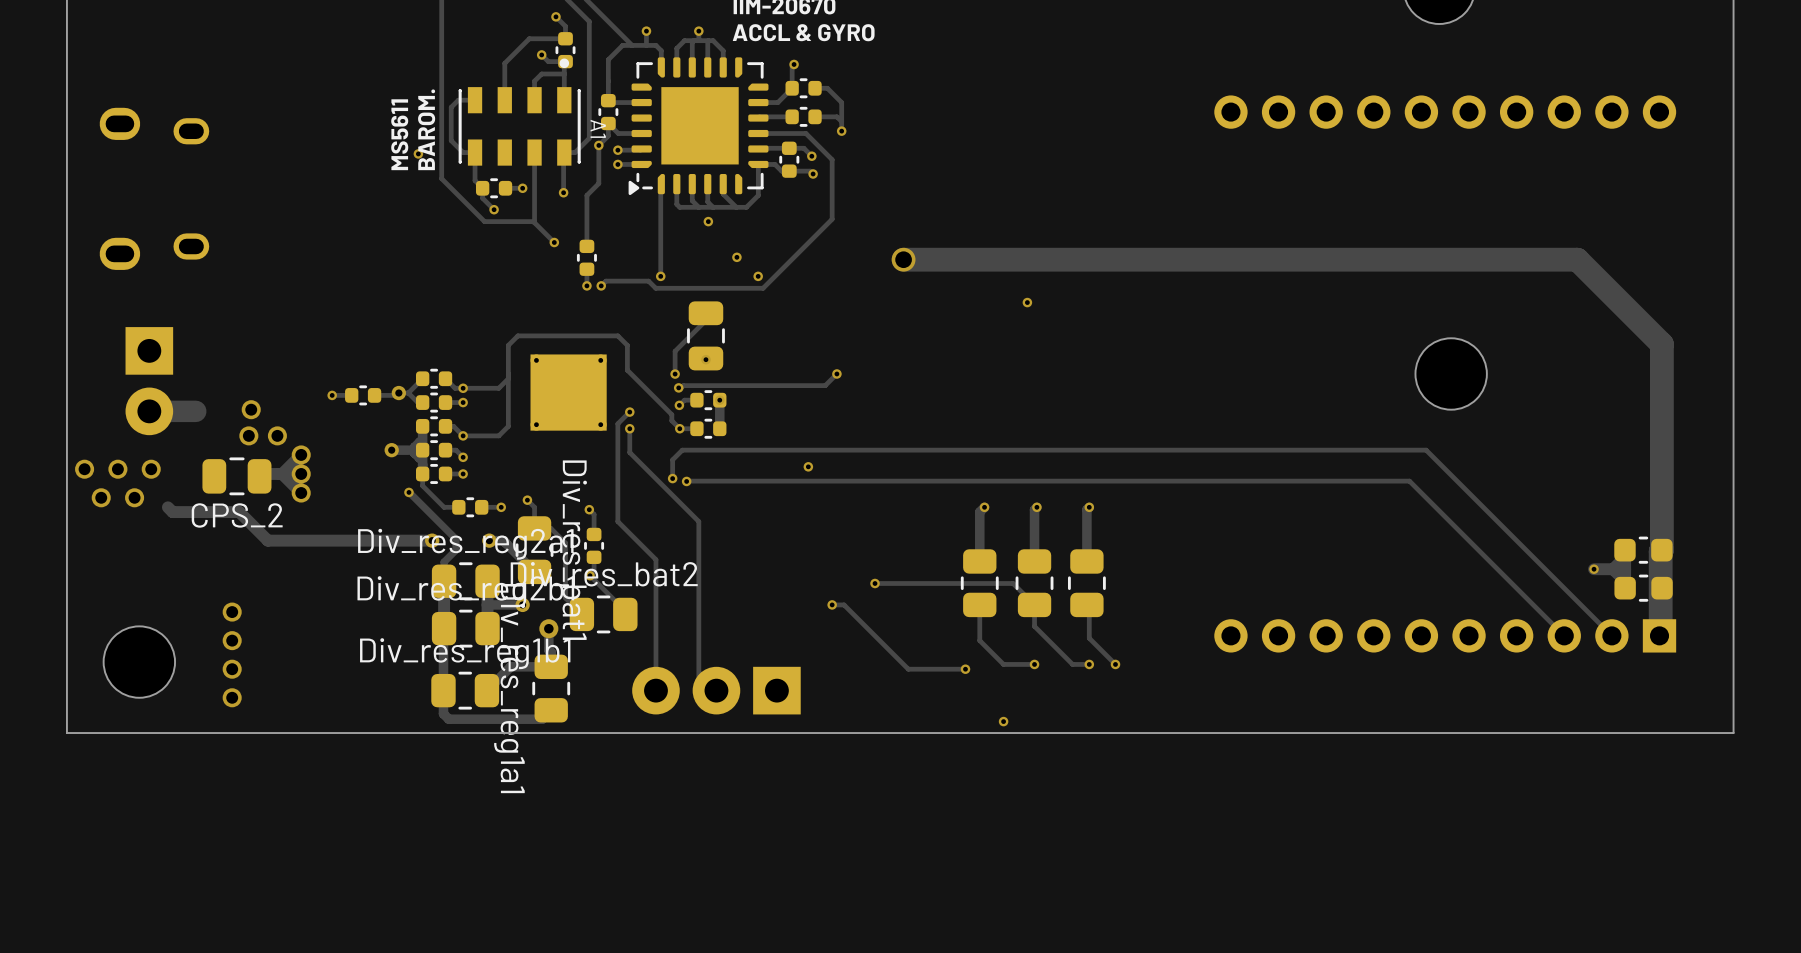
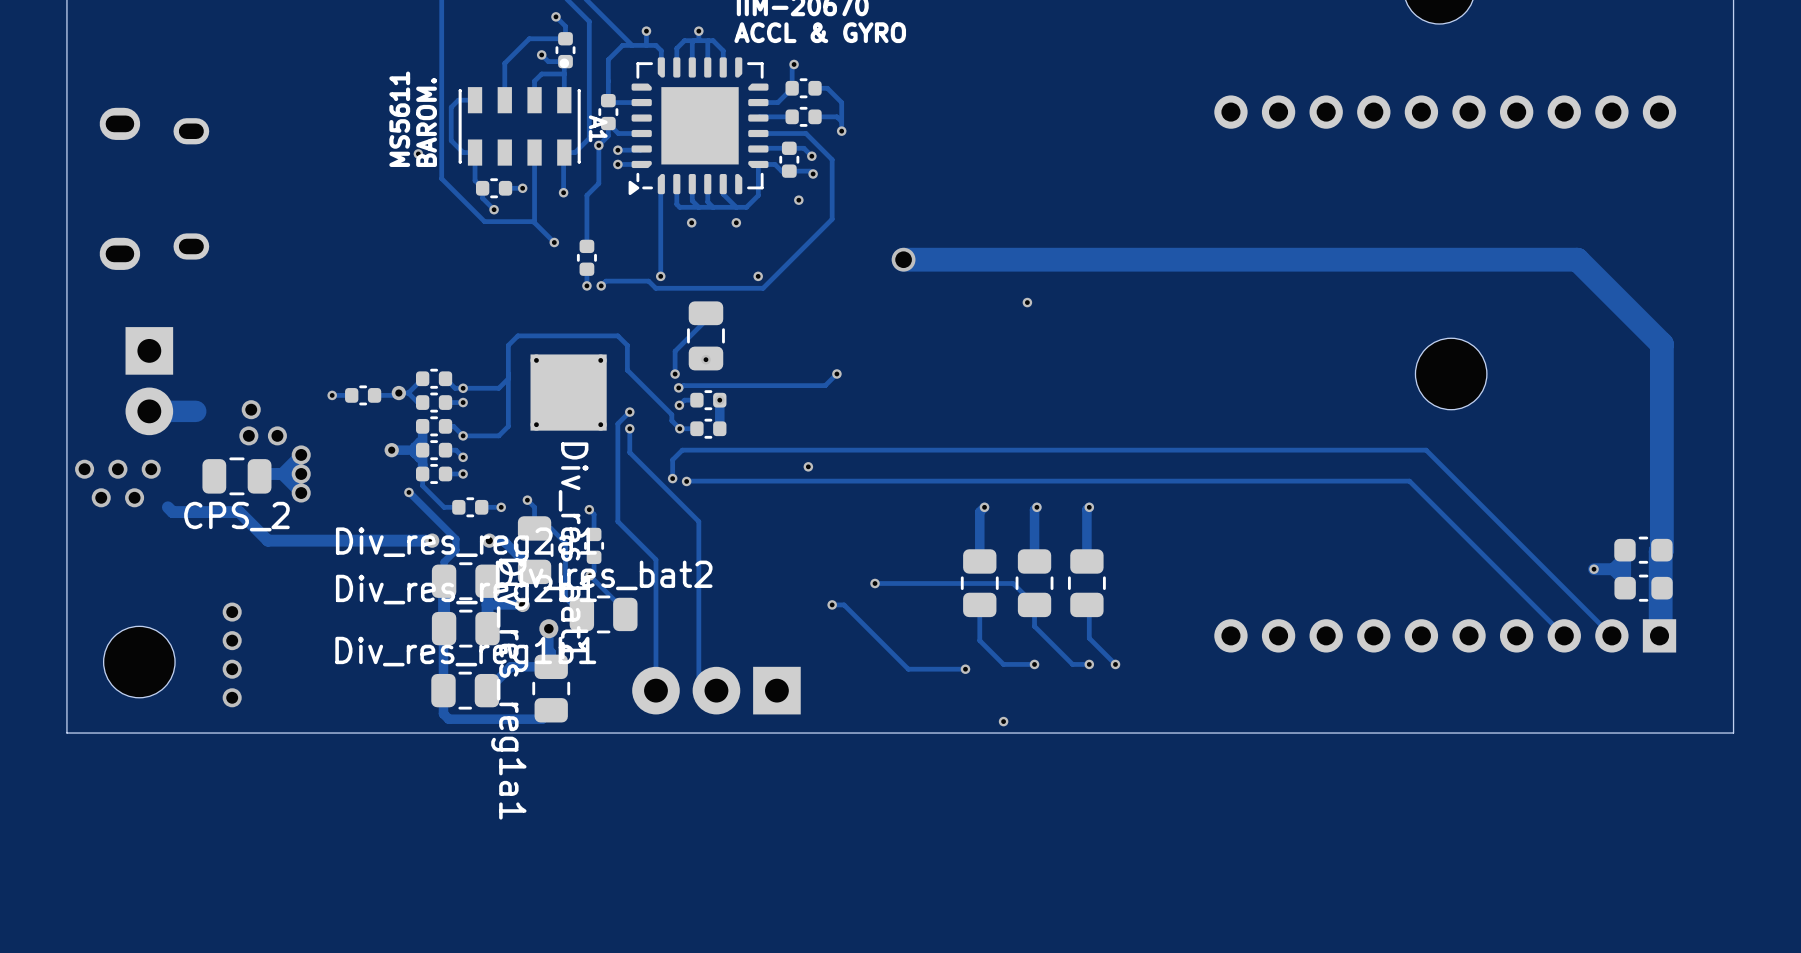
via: none -> (798, 200)
via: (708, 221) -> none
via: none -> (691, 222)
via: none -> (736, 222)
via: (736, 257) -> none

